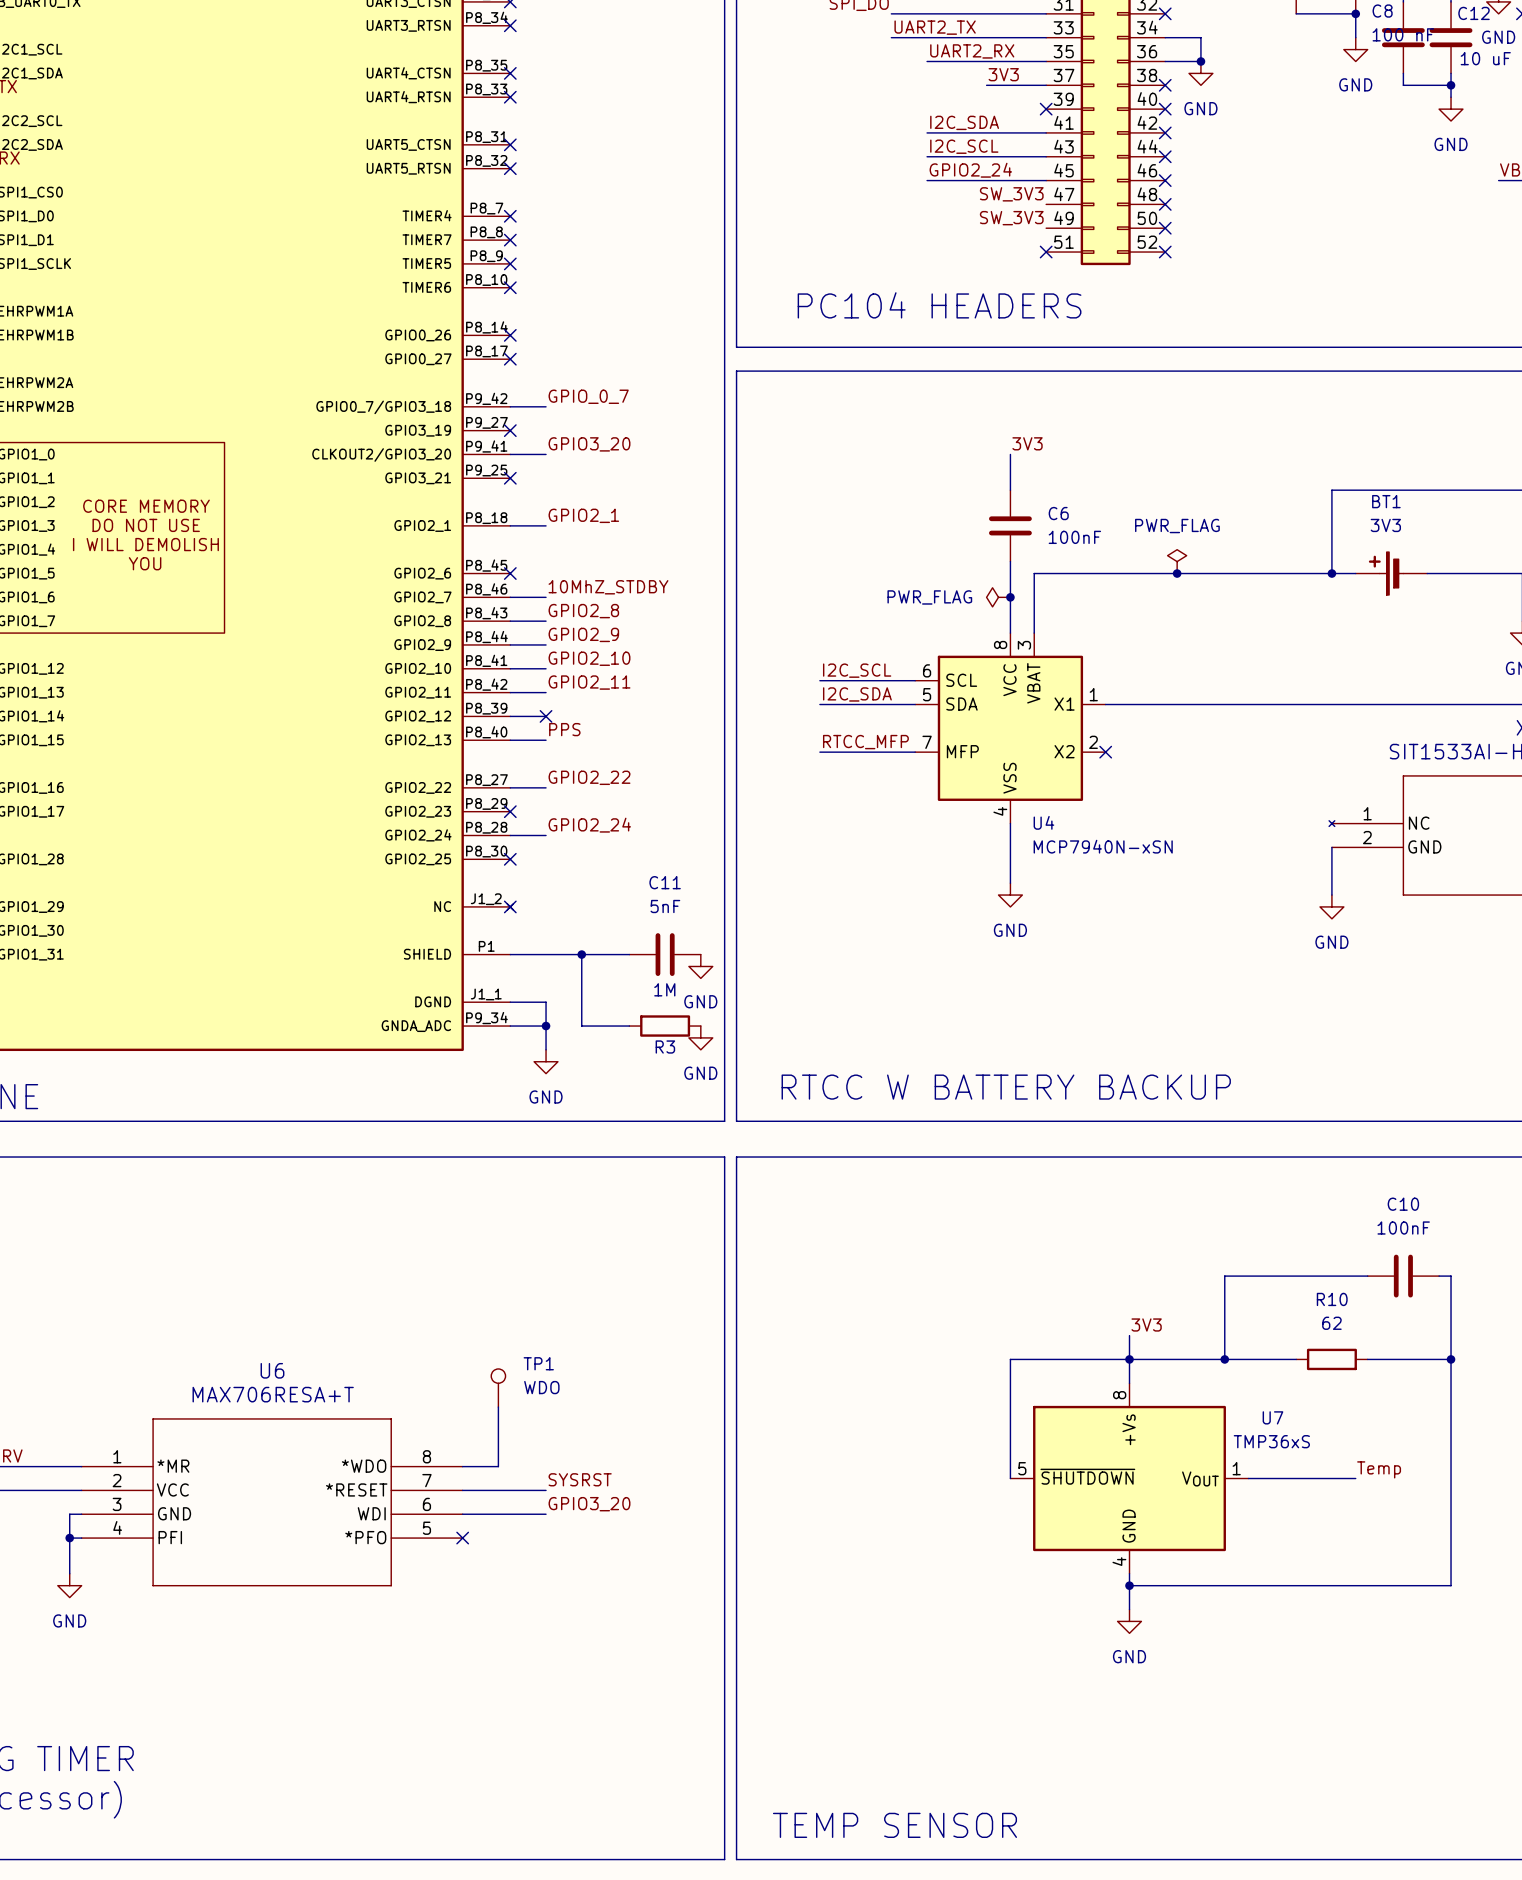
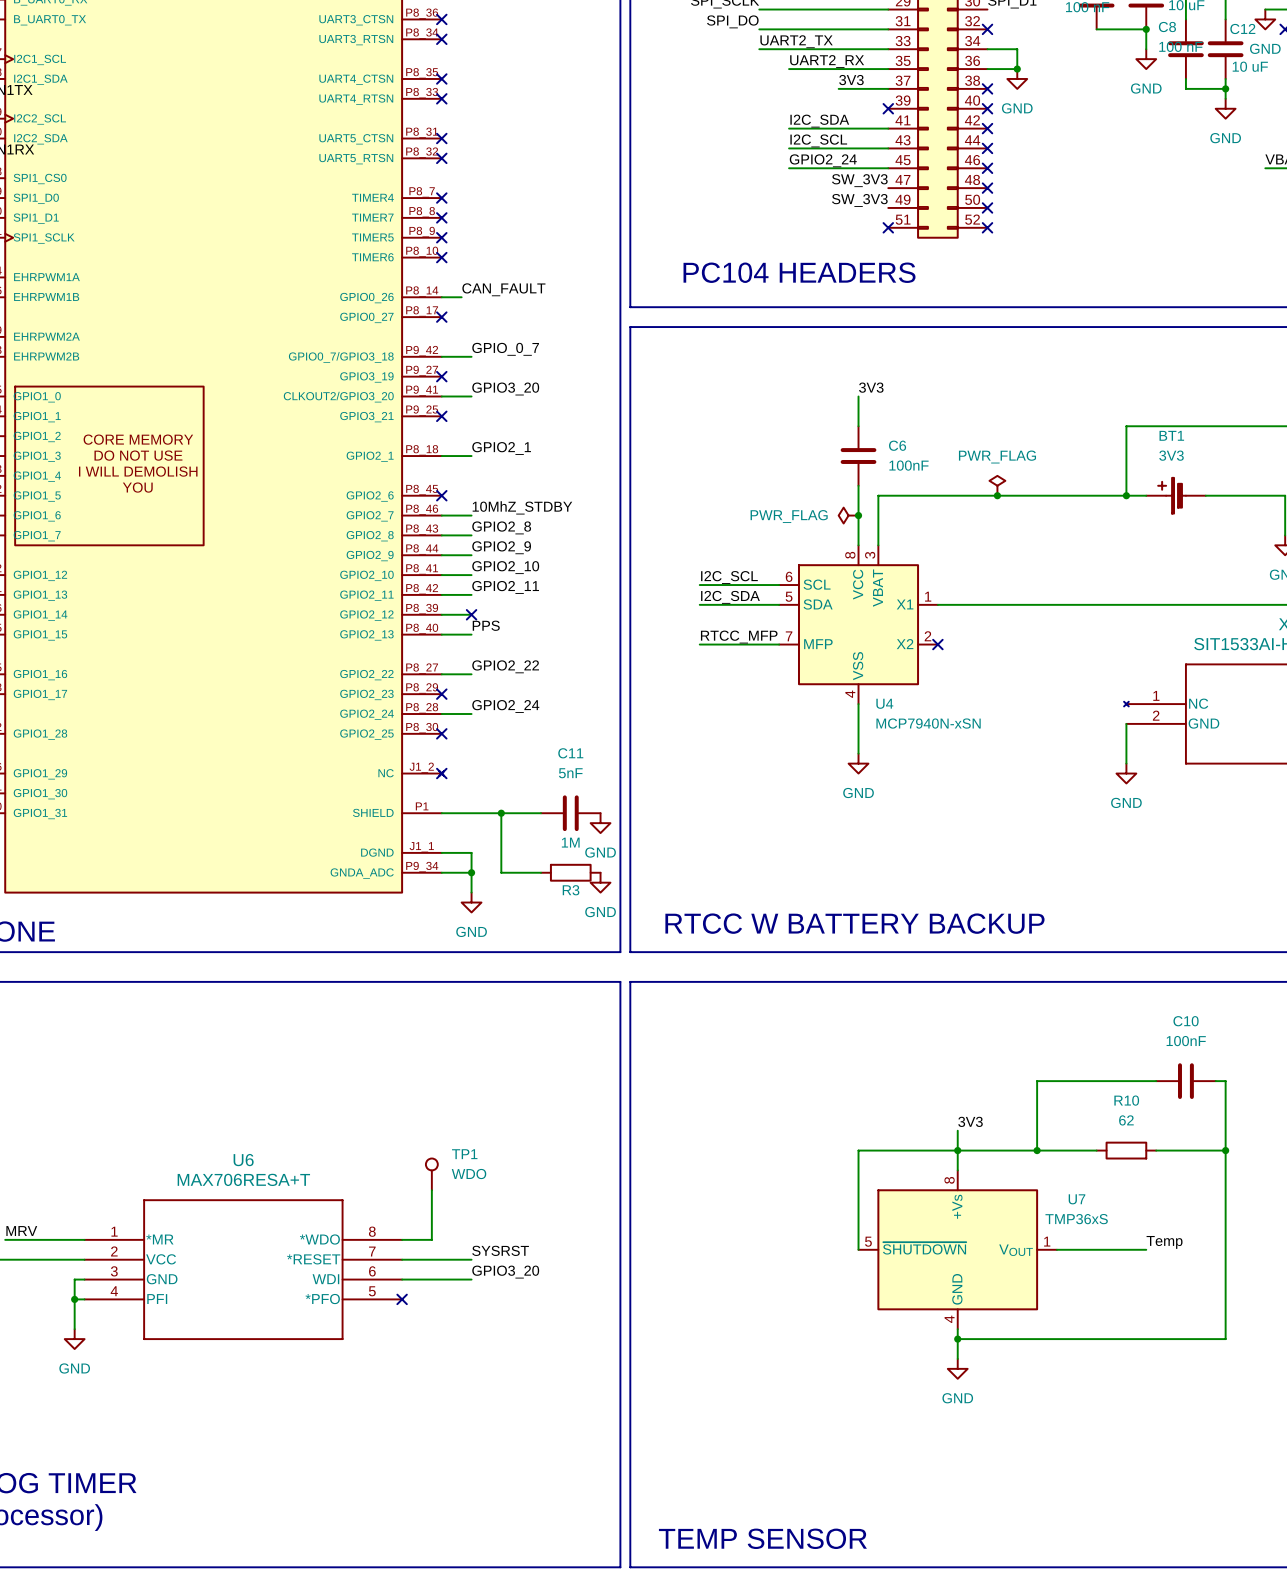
label: none -> CAN_FAULT (503, 289)
wire: none -> (441, 297) (461, 297)
no-connect mark: (510, 335) -> none

